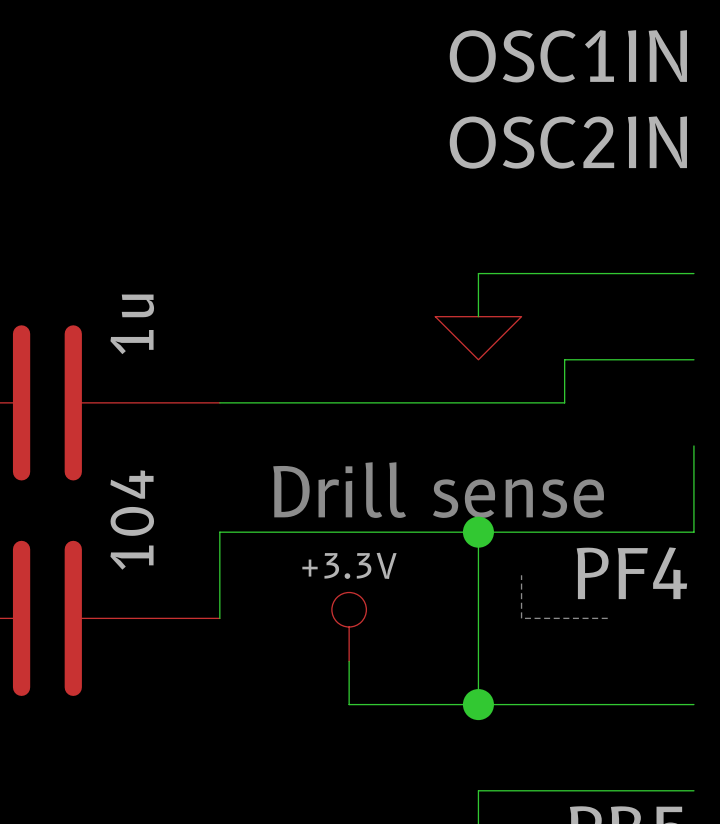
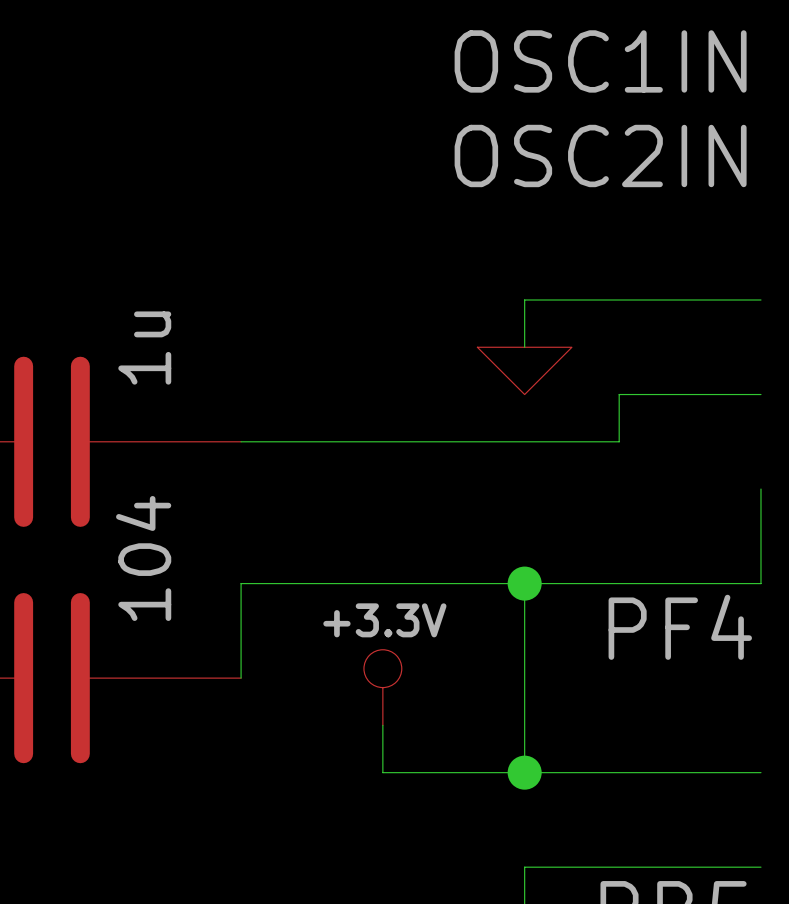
text: Drill sense (438, 490) -> none
line: (521, 575) (521, 618) (607, 618) -> none

